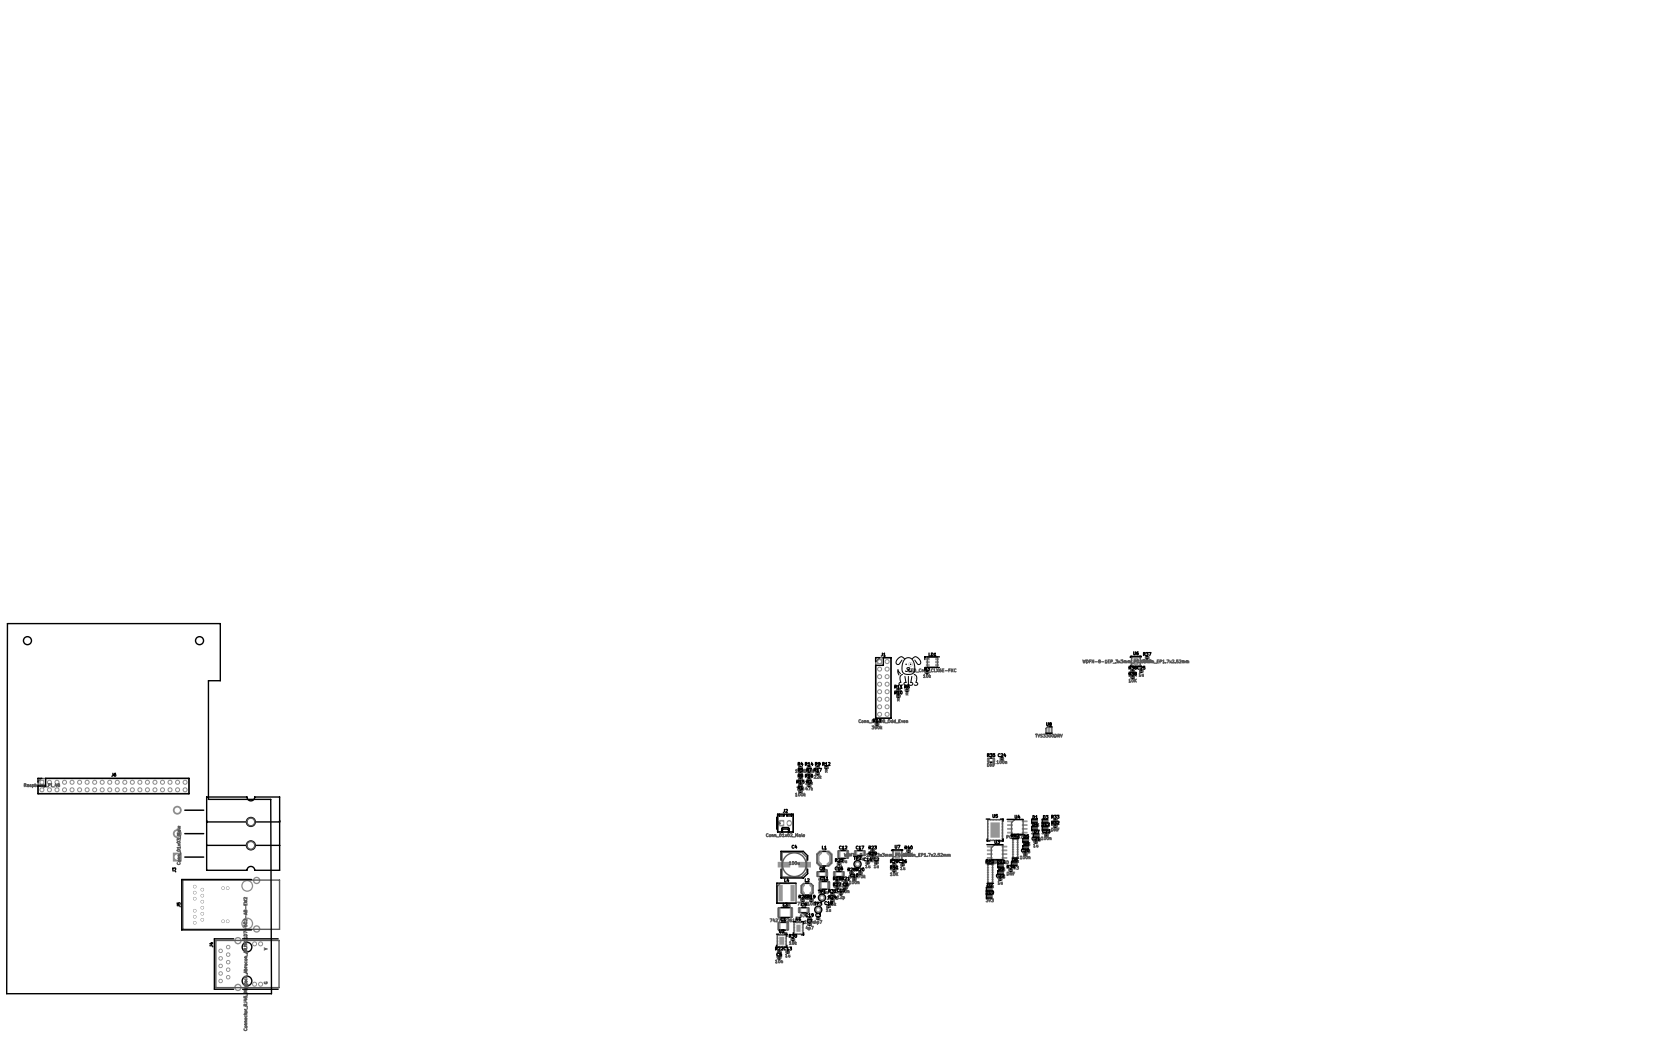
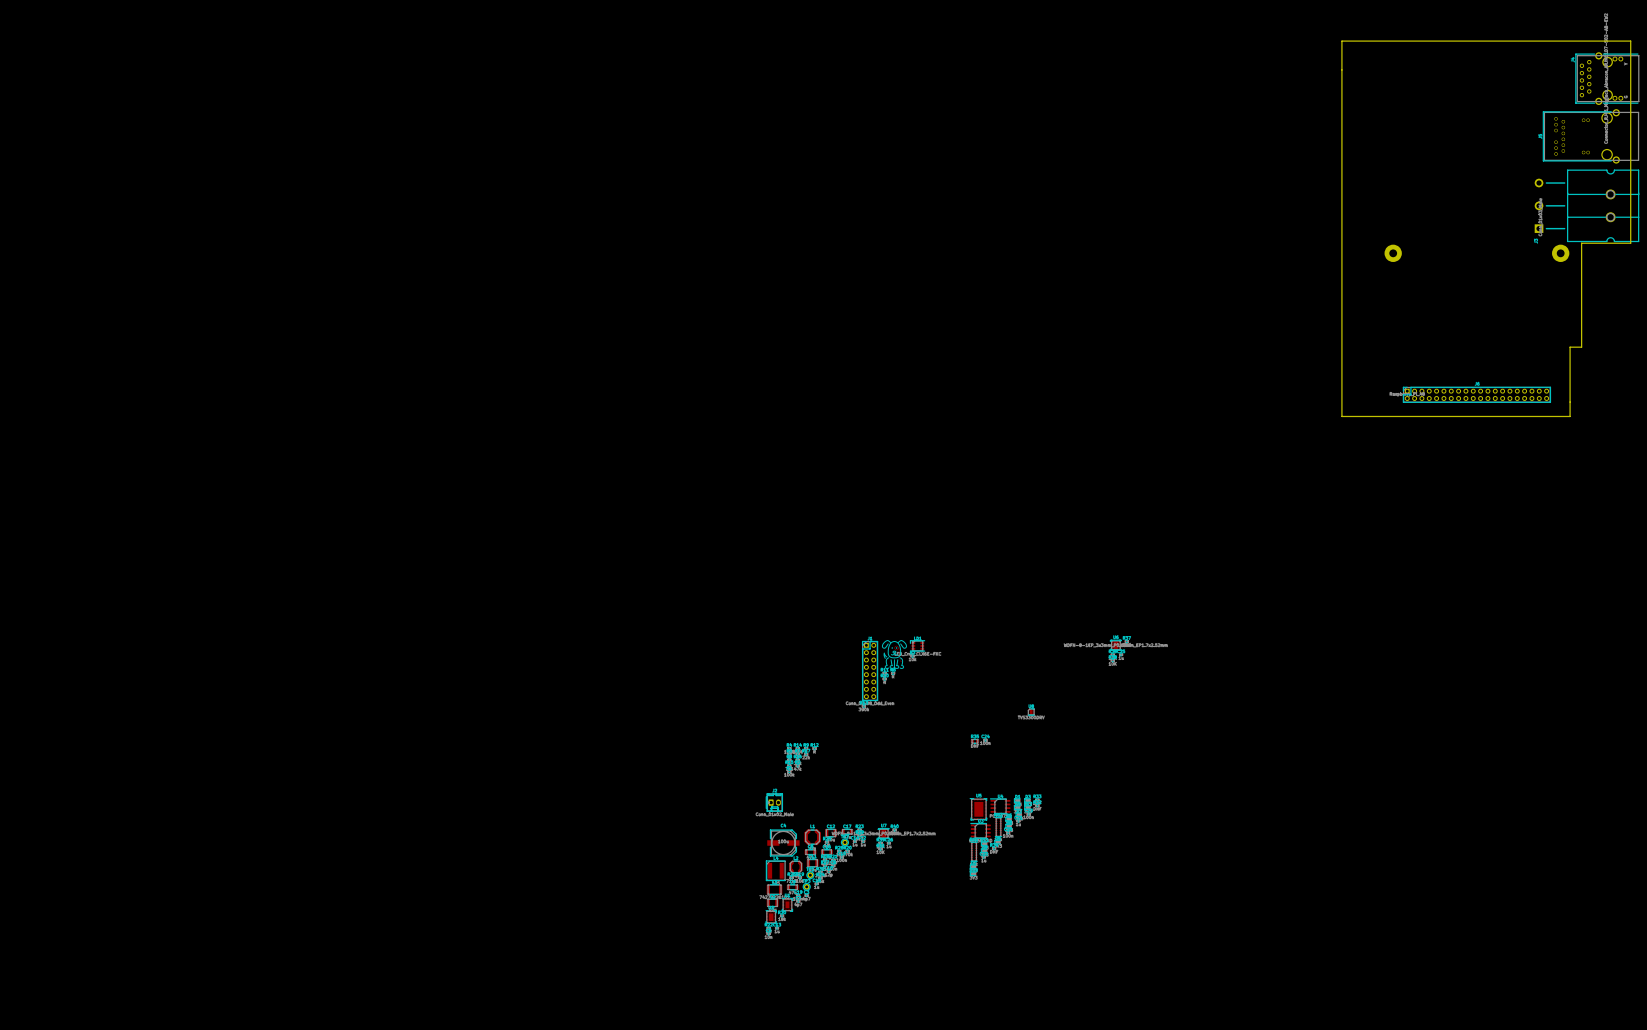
board edge: none -> (1341, 41) (1341, 416) (1570, 416) (1570, 347) (1581, 347) (1581, 243) (1630, 243) (1630, 41) (1341, 41)
board edge: (7, 623) (220, 623) (220, 680) (208, 680) (208, 799) (270, 799) (271, 993) (6, 993) (7, 623) -> none
part footprint: [23, 636, 204, 794] -> [1384, 244, 1570, 403]
part position: (226, 833) -> (1586, 205)
part position: (230, 904) -> (1590, 136)
part position: (246, 964) -> (1607, 78)

